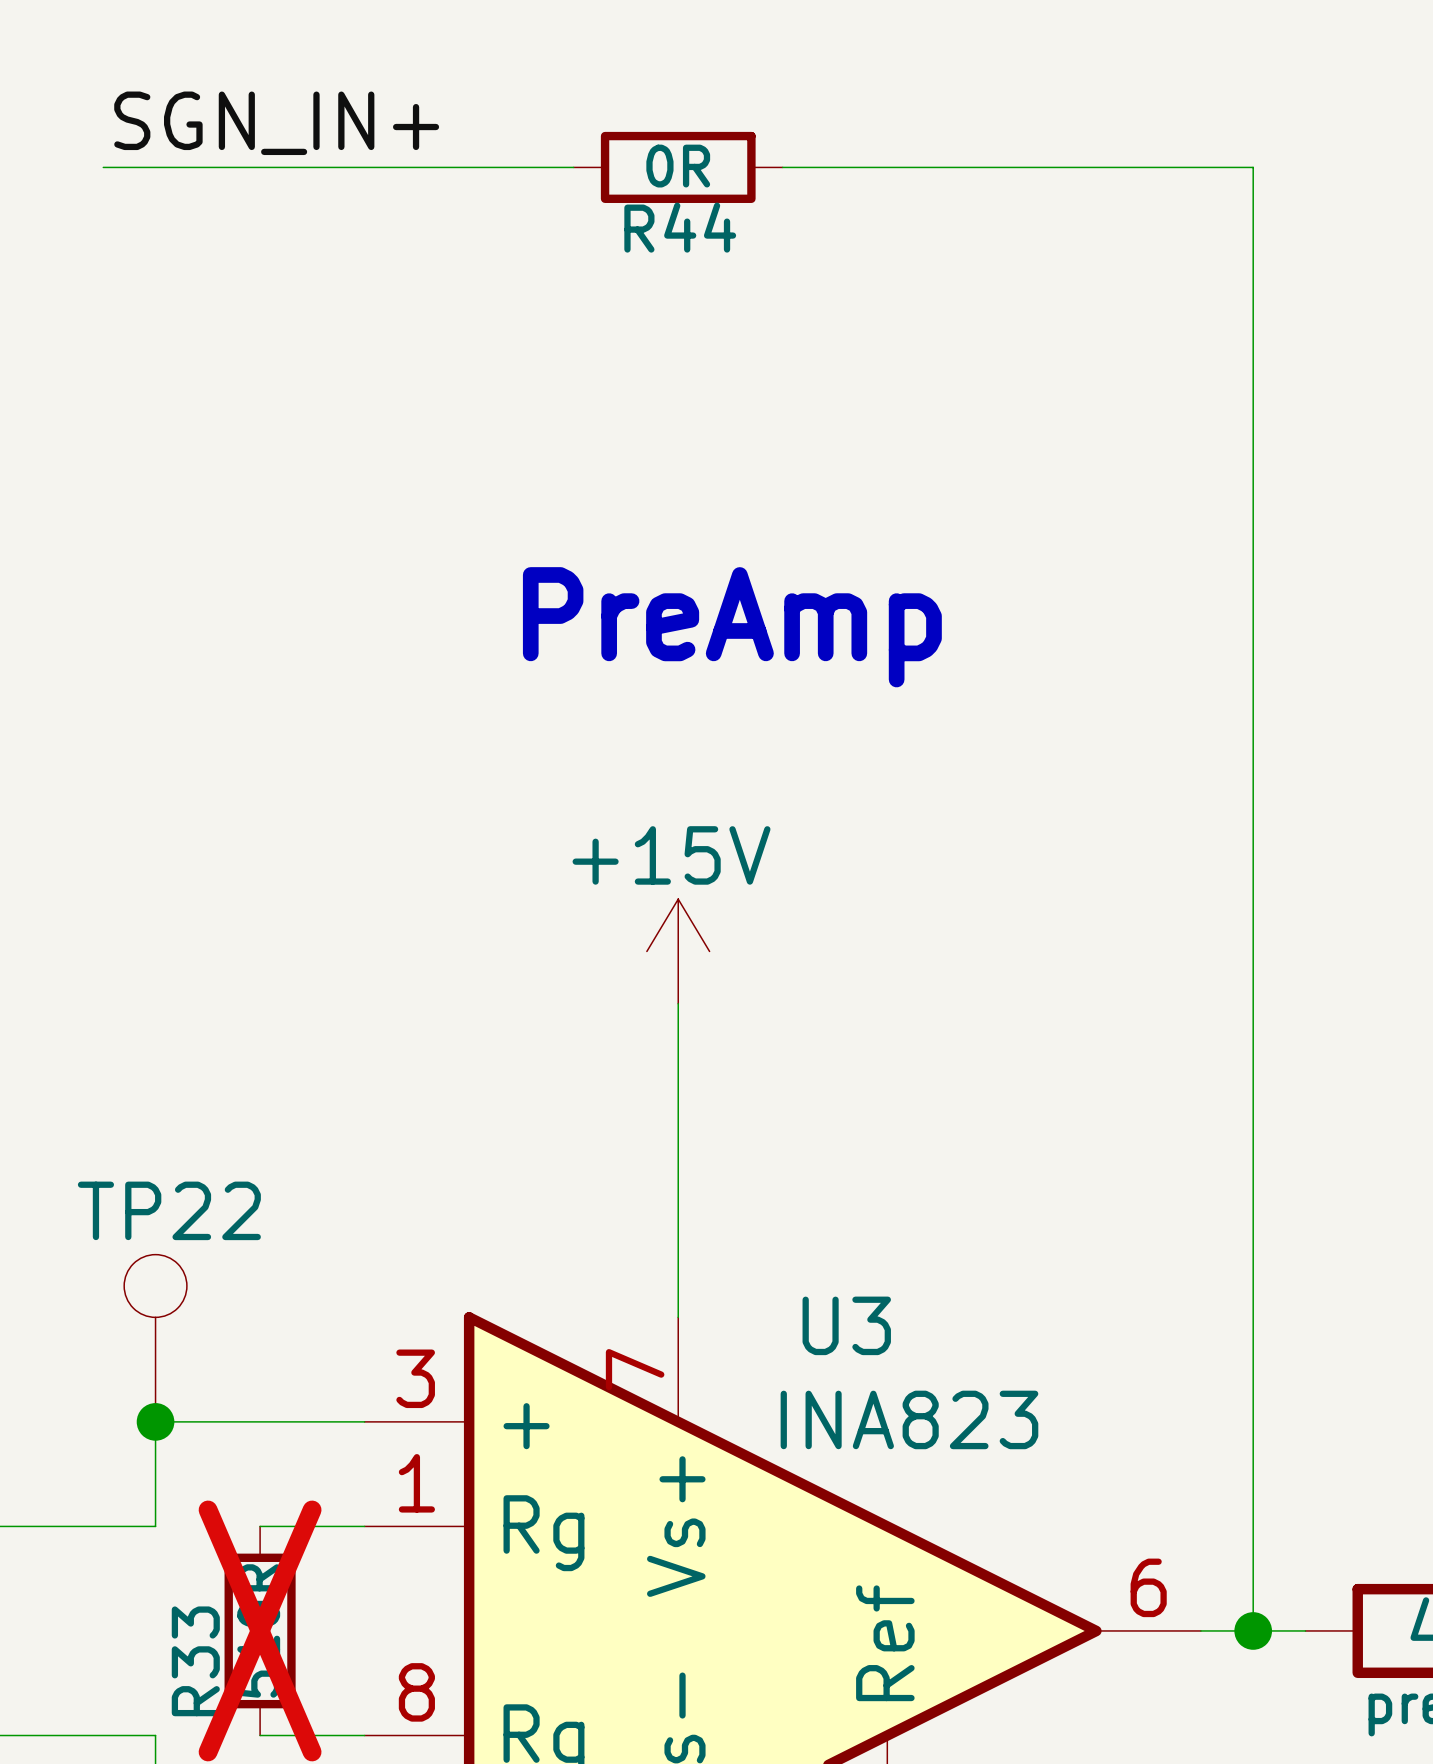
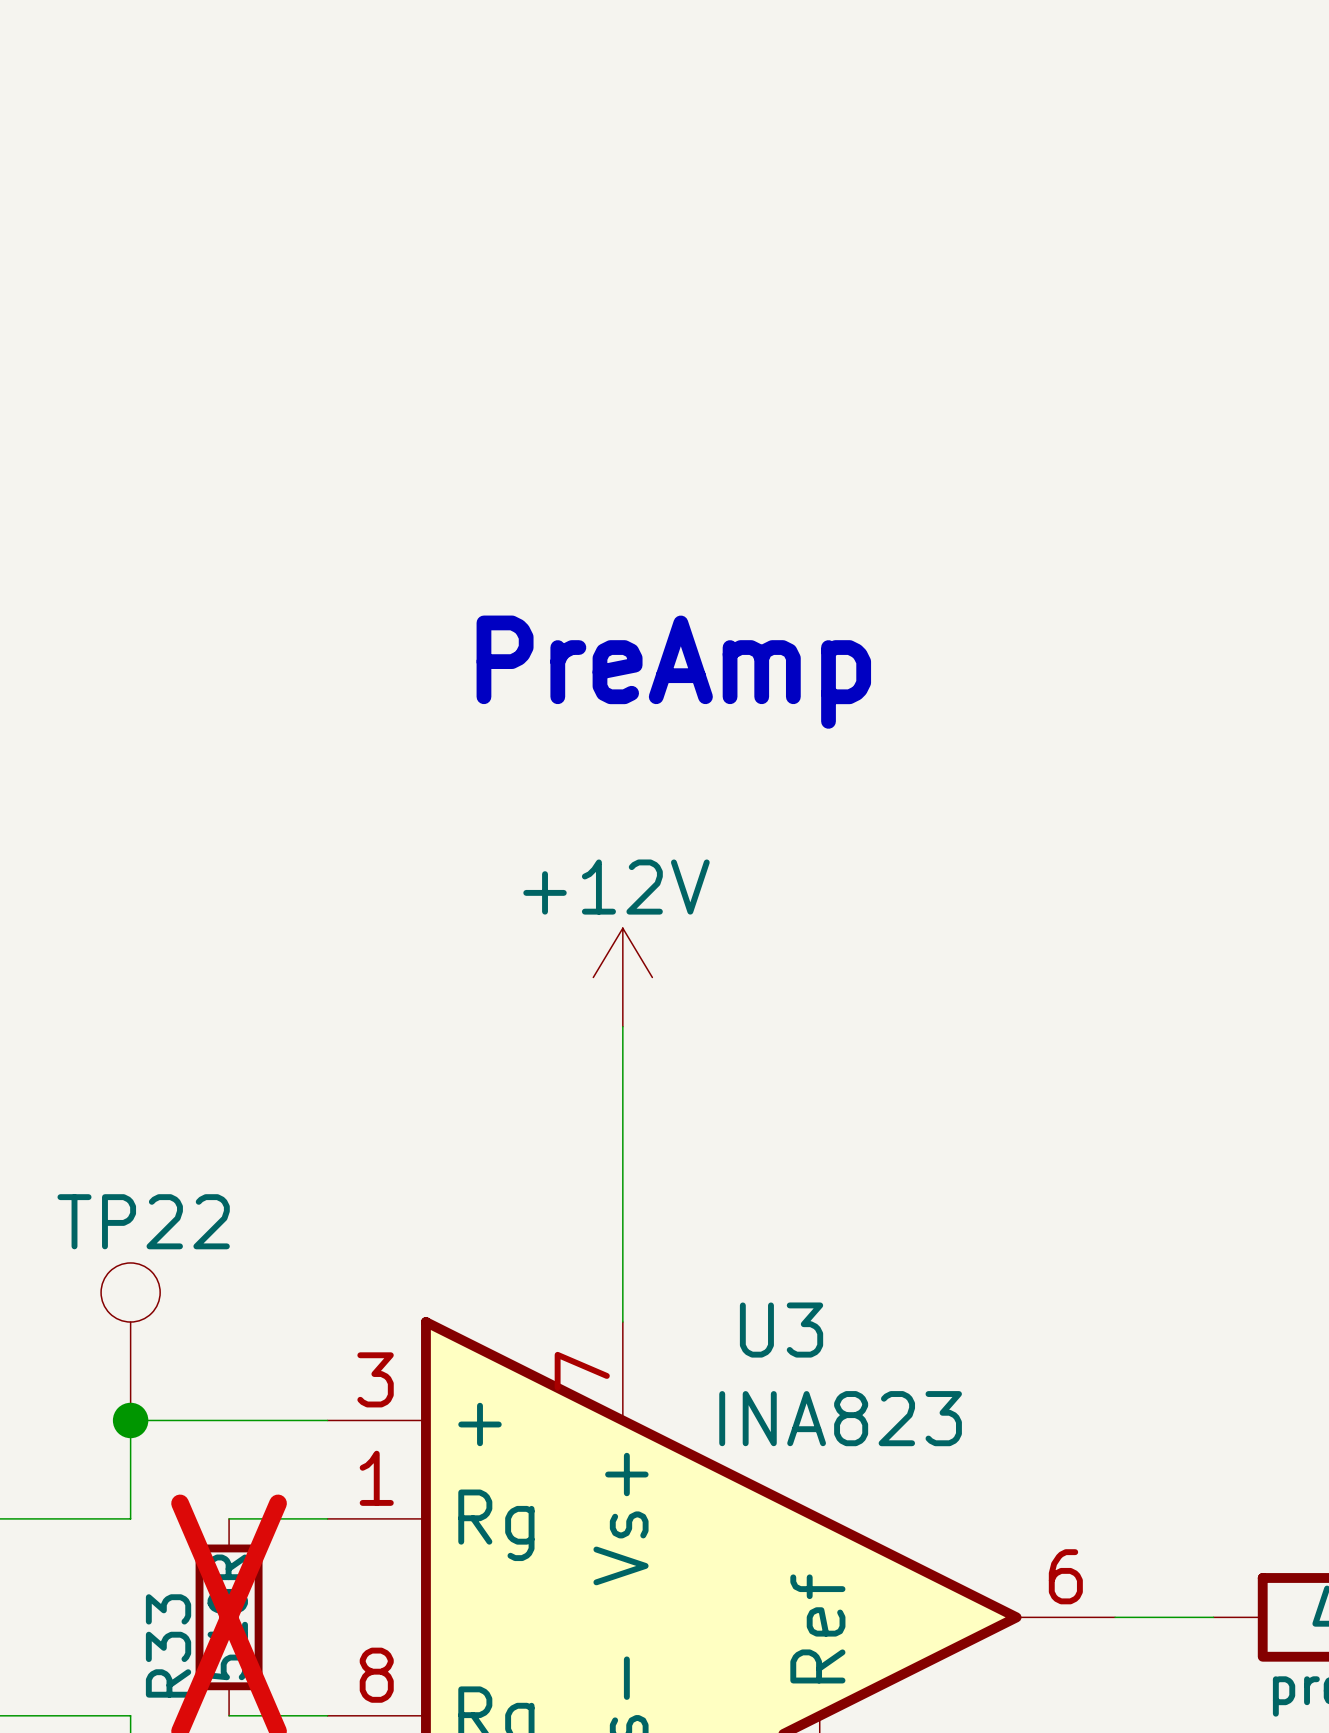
label: SGN_IN+ (276, 123) -> none
wire: (103, 167) (573, 167) -> none
R44: 0R (678, 167) -> none
wire: (782, 167) (1253, 167) (1253, 1630) -> none
power symbol: +15V (678, 951) -> +12V (622, 977)
junction: (1253, 1630) -> none

